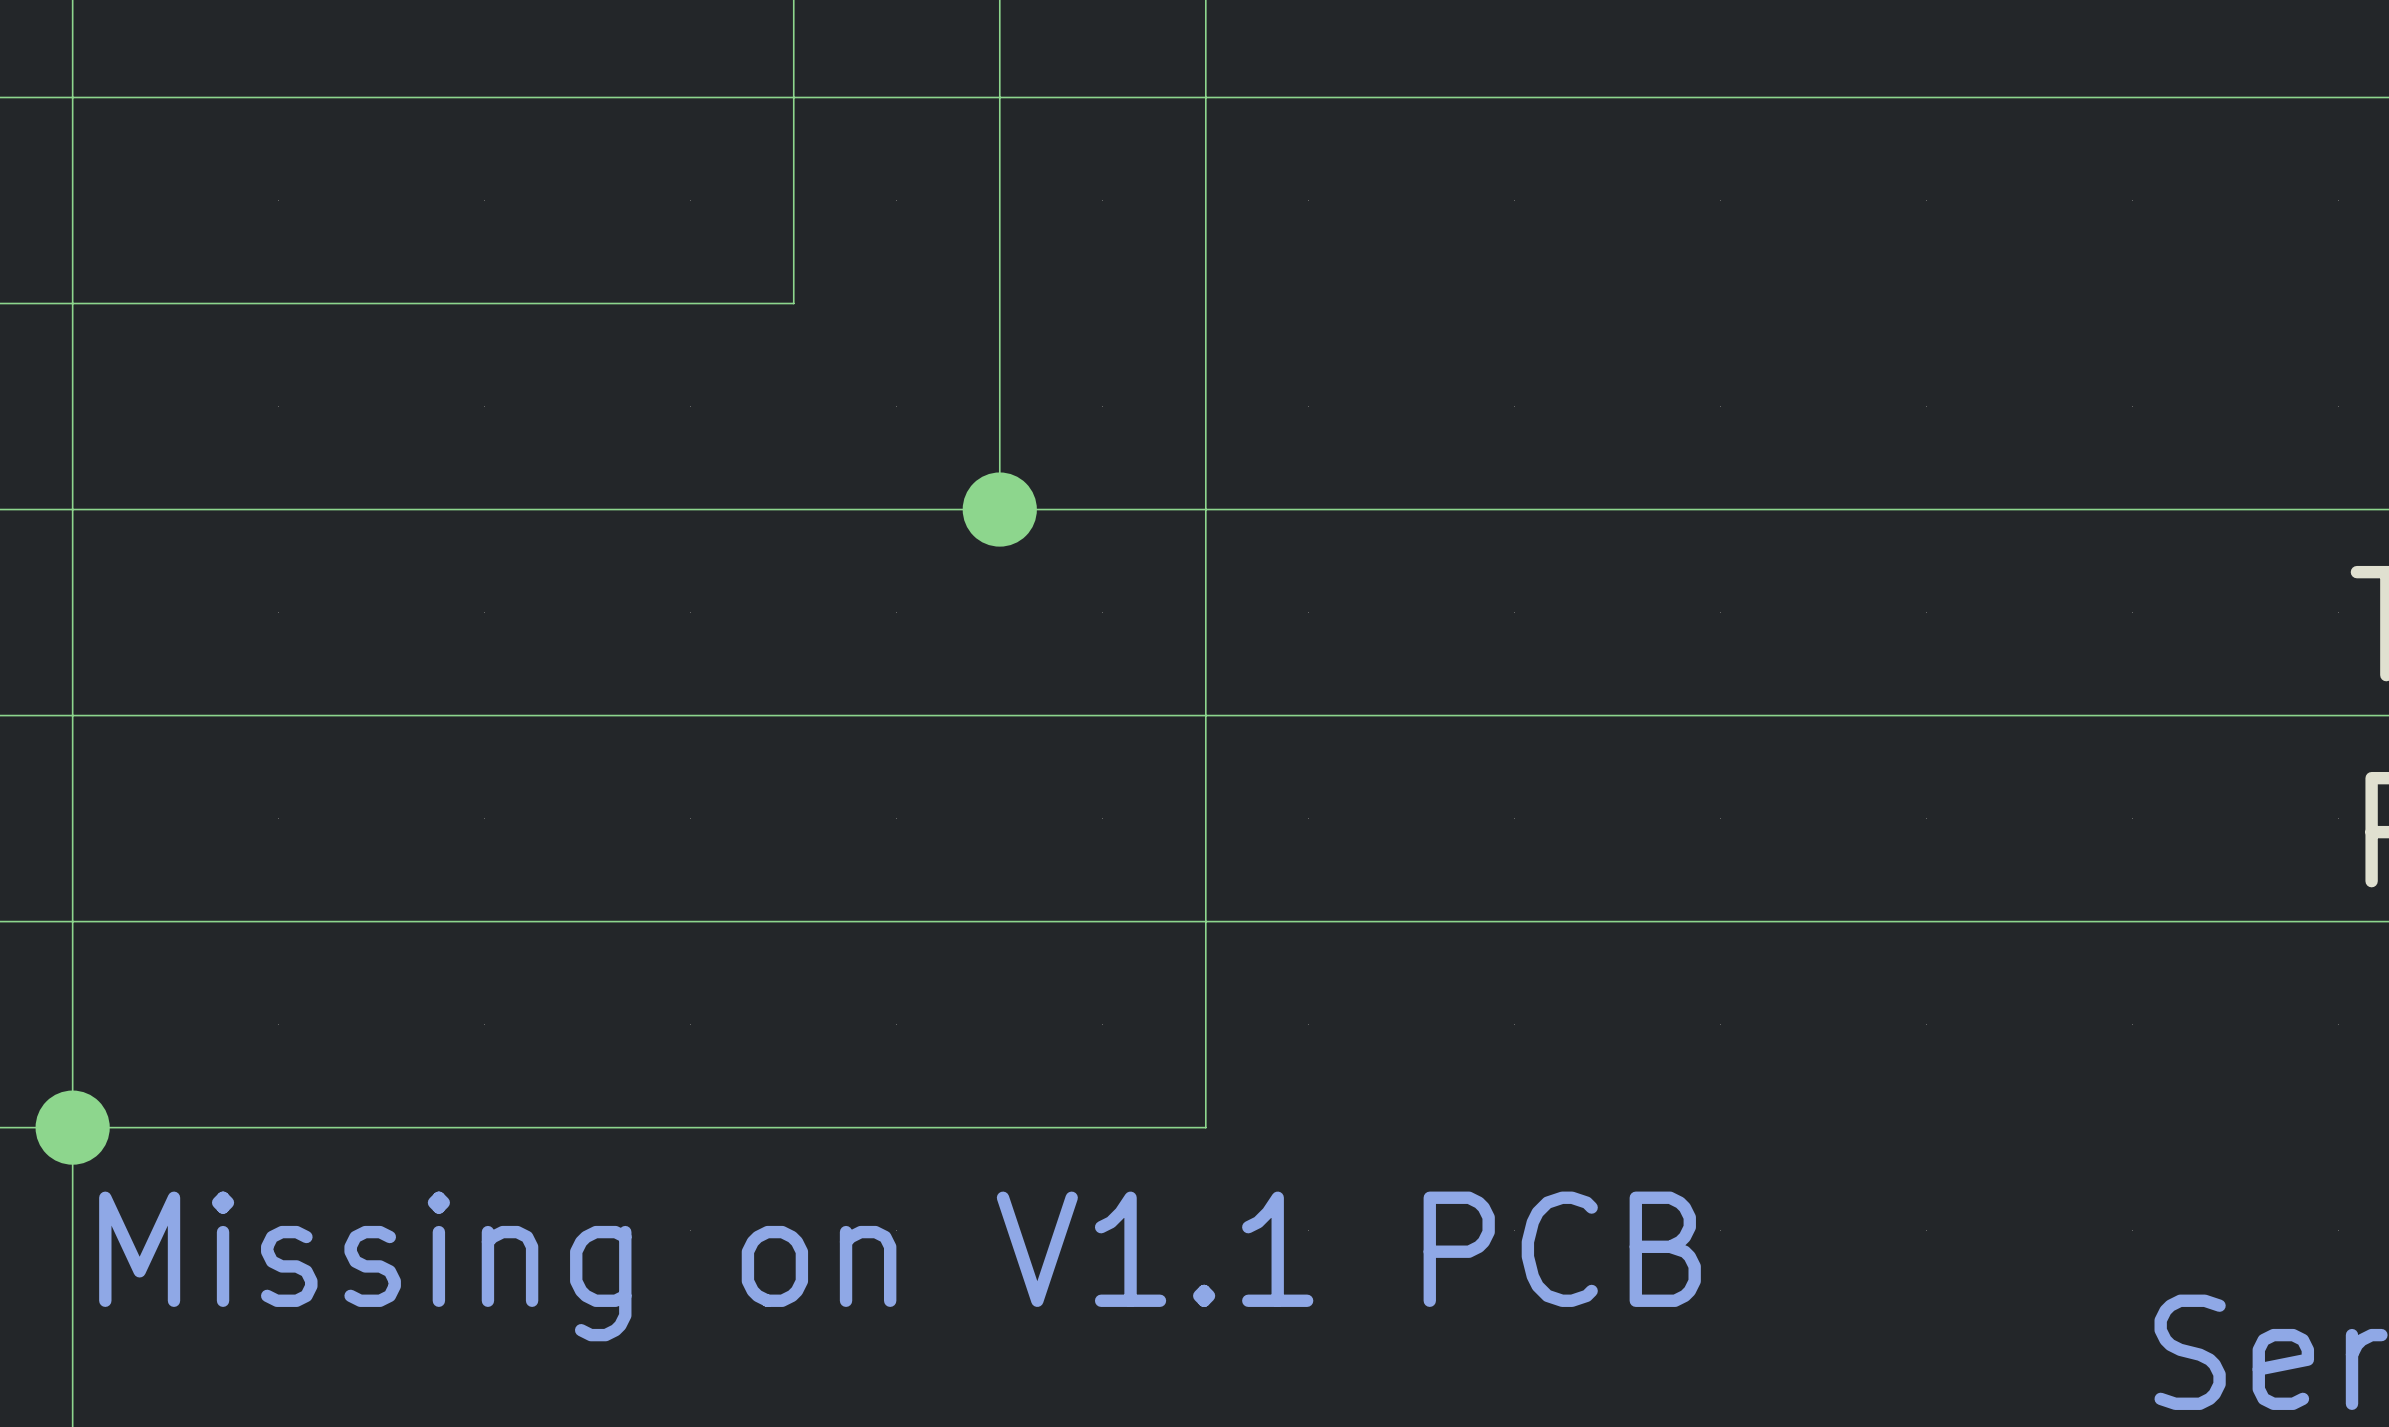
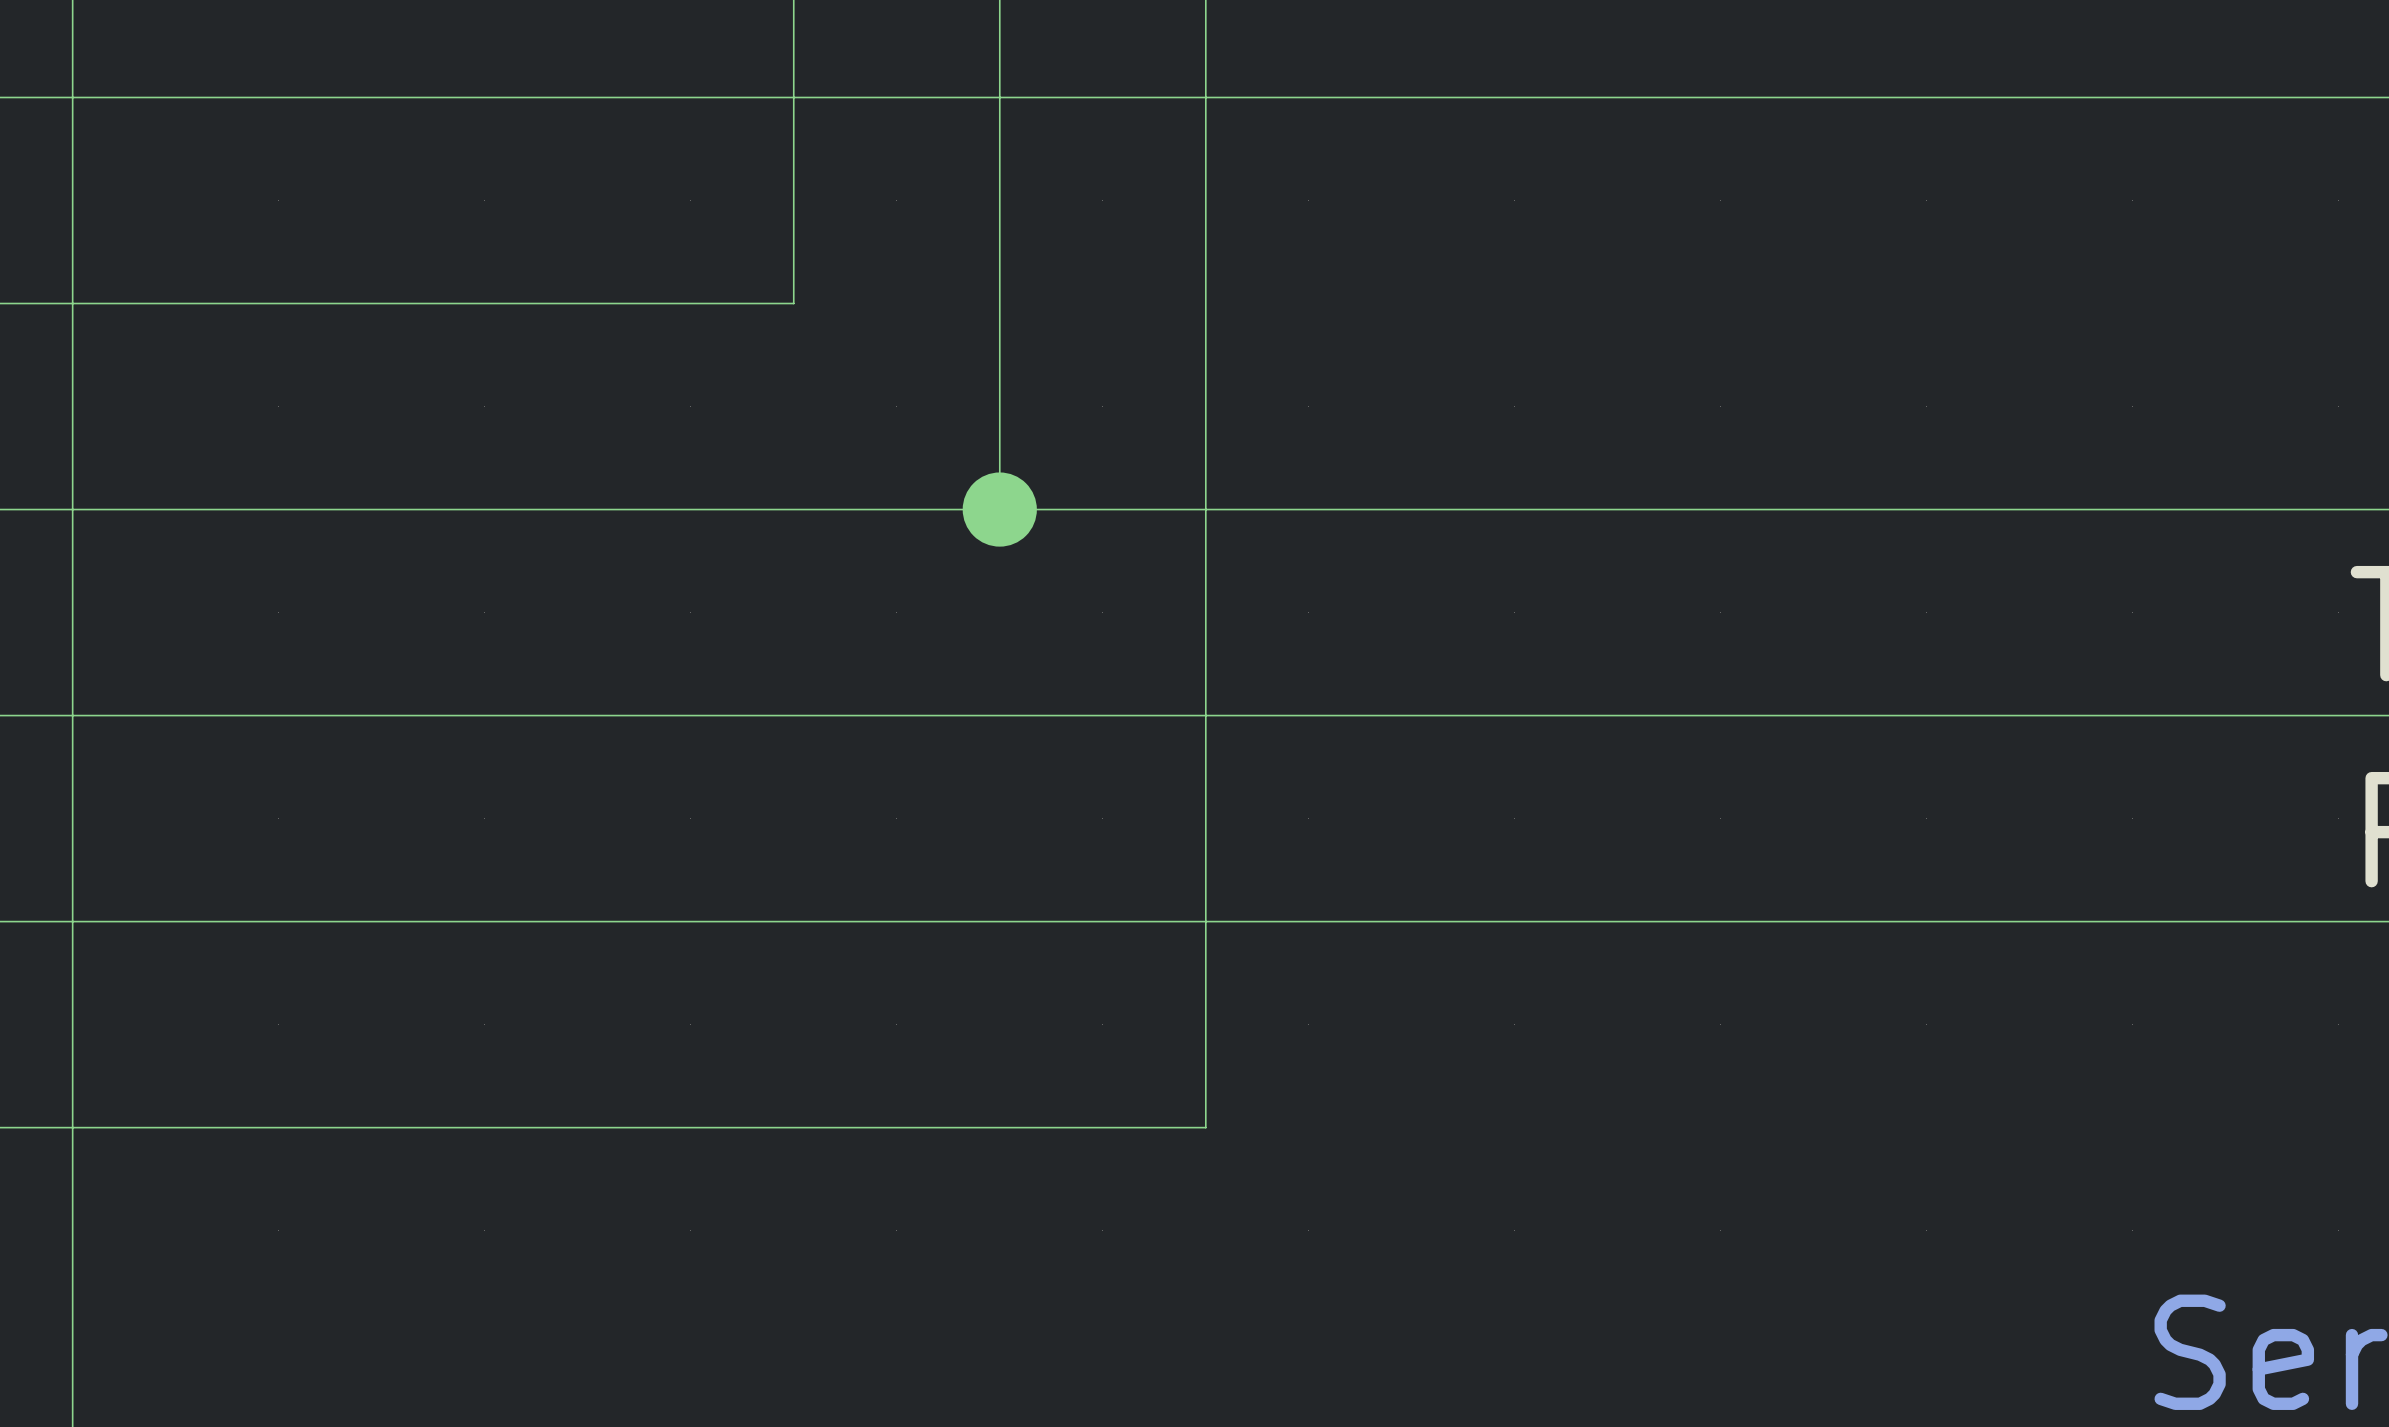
junction: (72, 1127) -> none
text: Missing on V1.1 PCB (899, 1266) -> none

